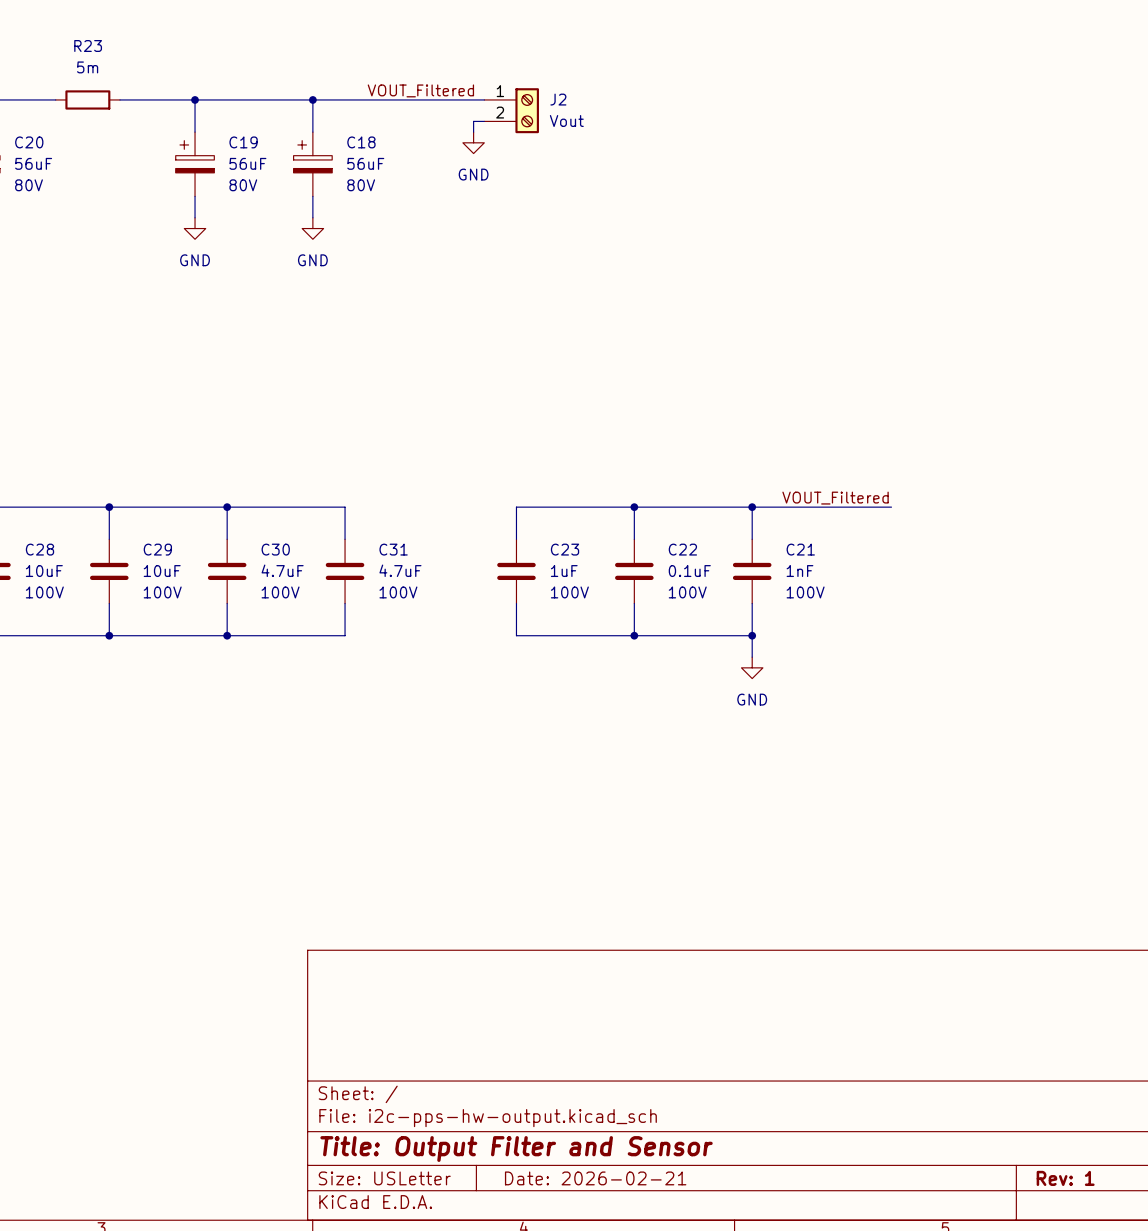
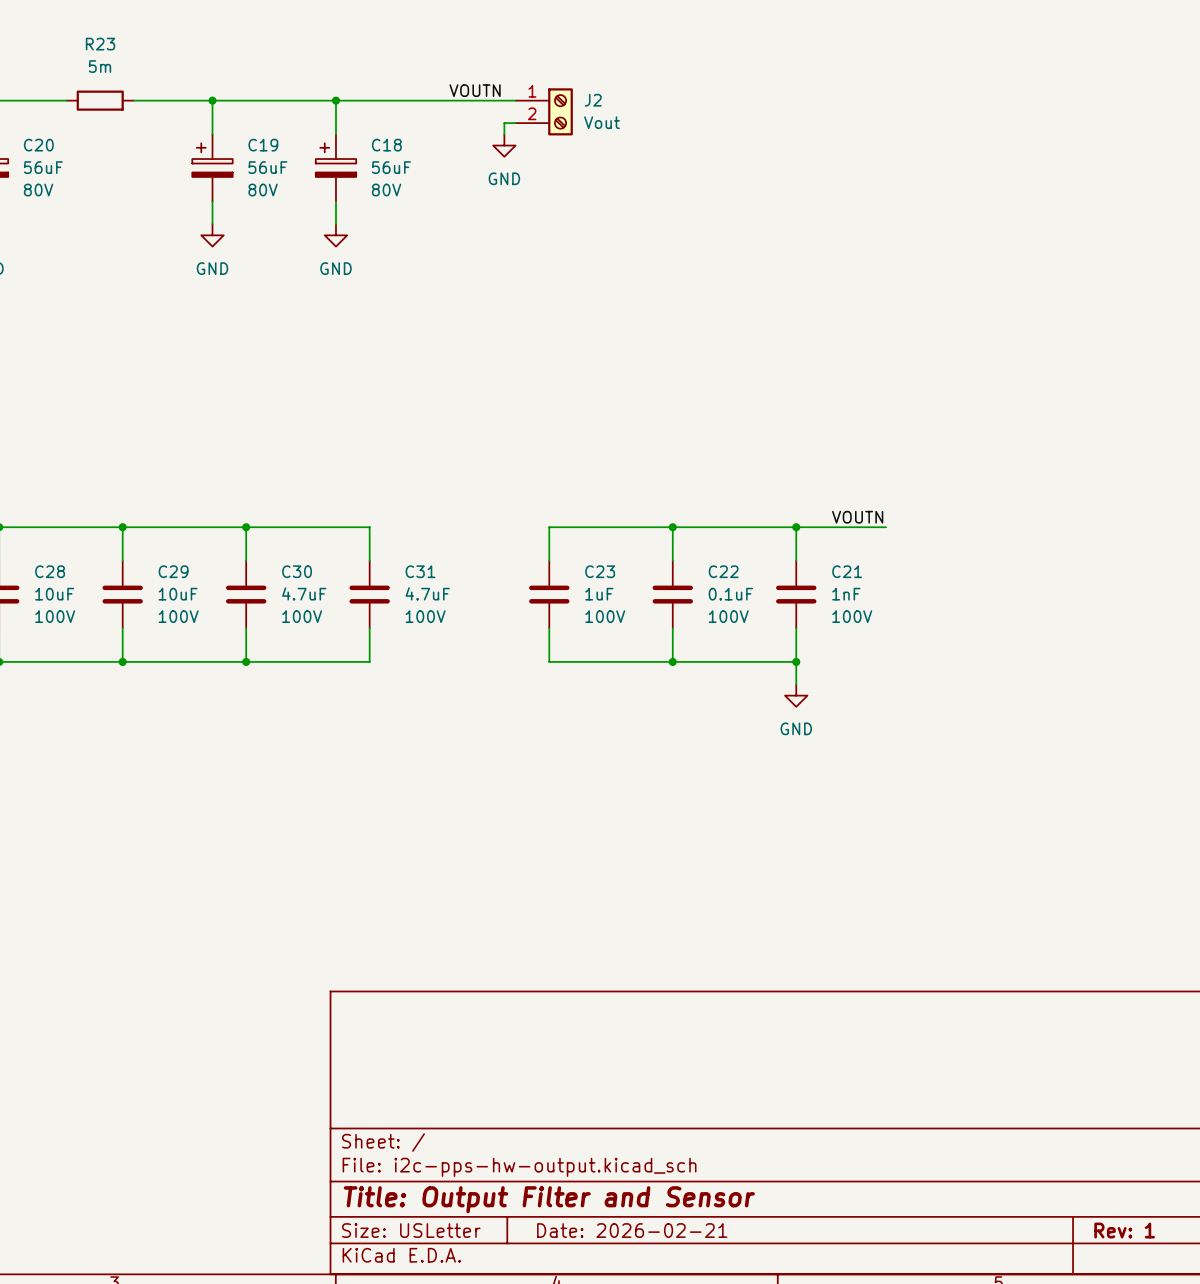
label: VOUT_Filtered (420, 90) -> none
label: none -> VOUTN (475, 90)
label: none -> VOUTN (857, 517)
label: VOUT_Filtered (835, 498) -> none
wire: (837, 507) (891, 507) -> none

